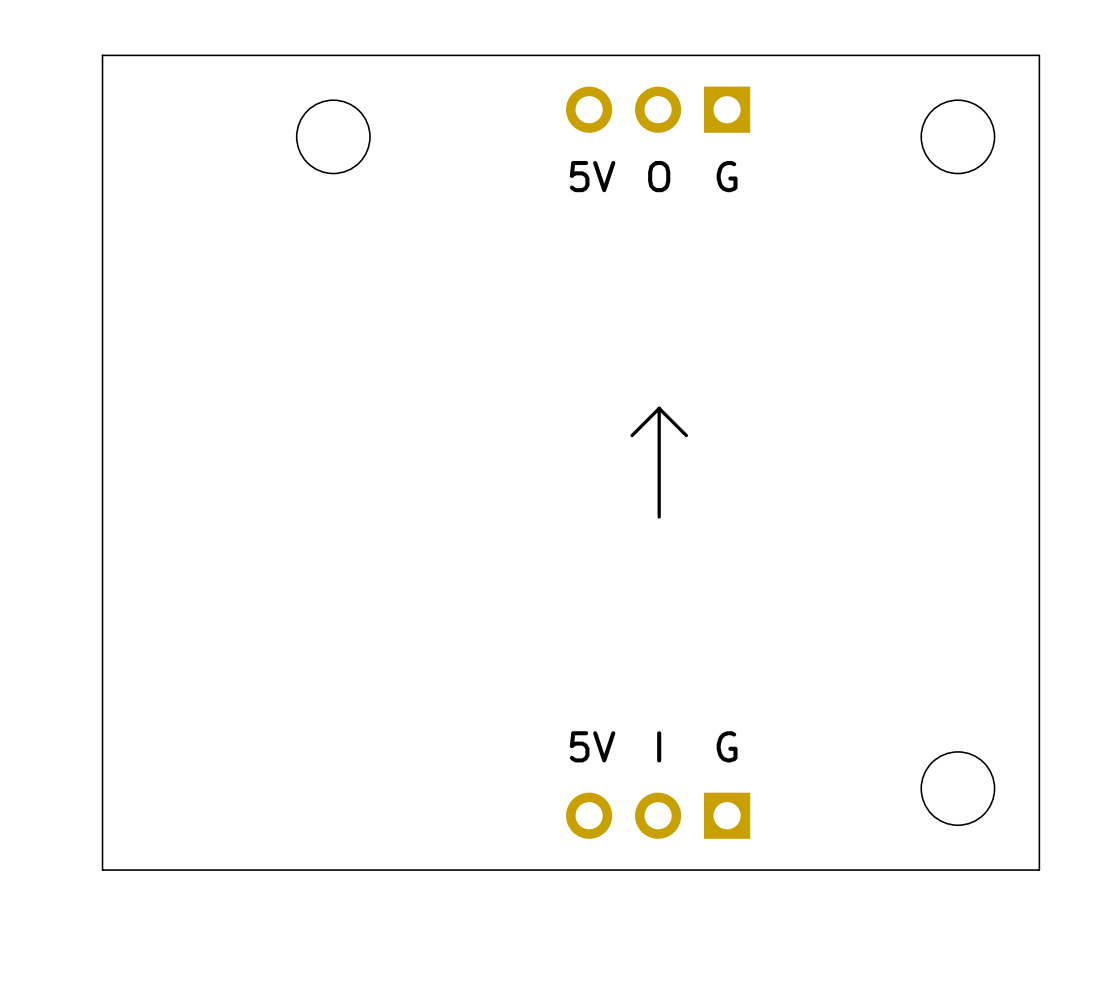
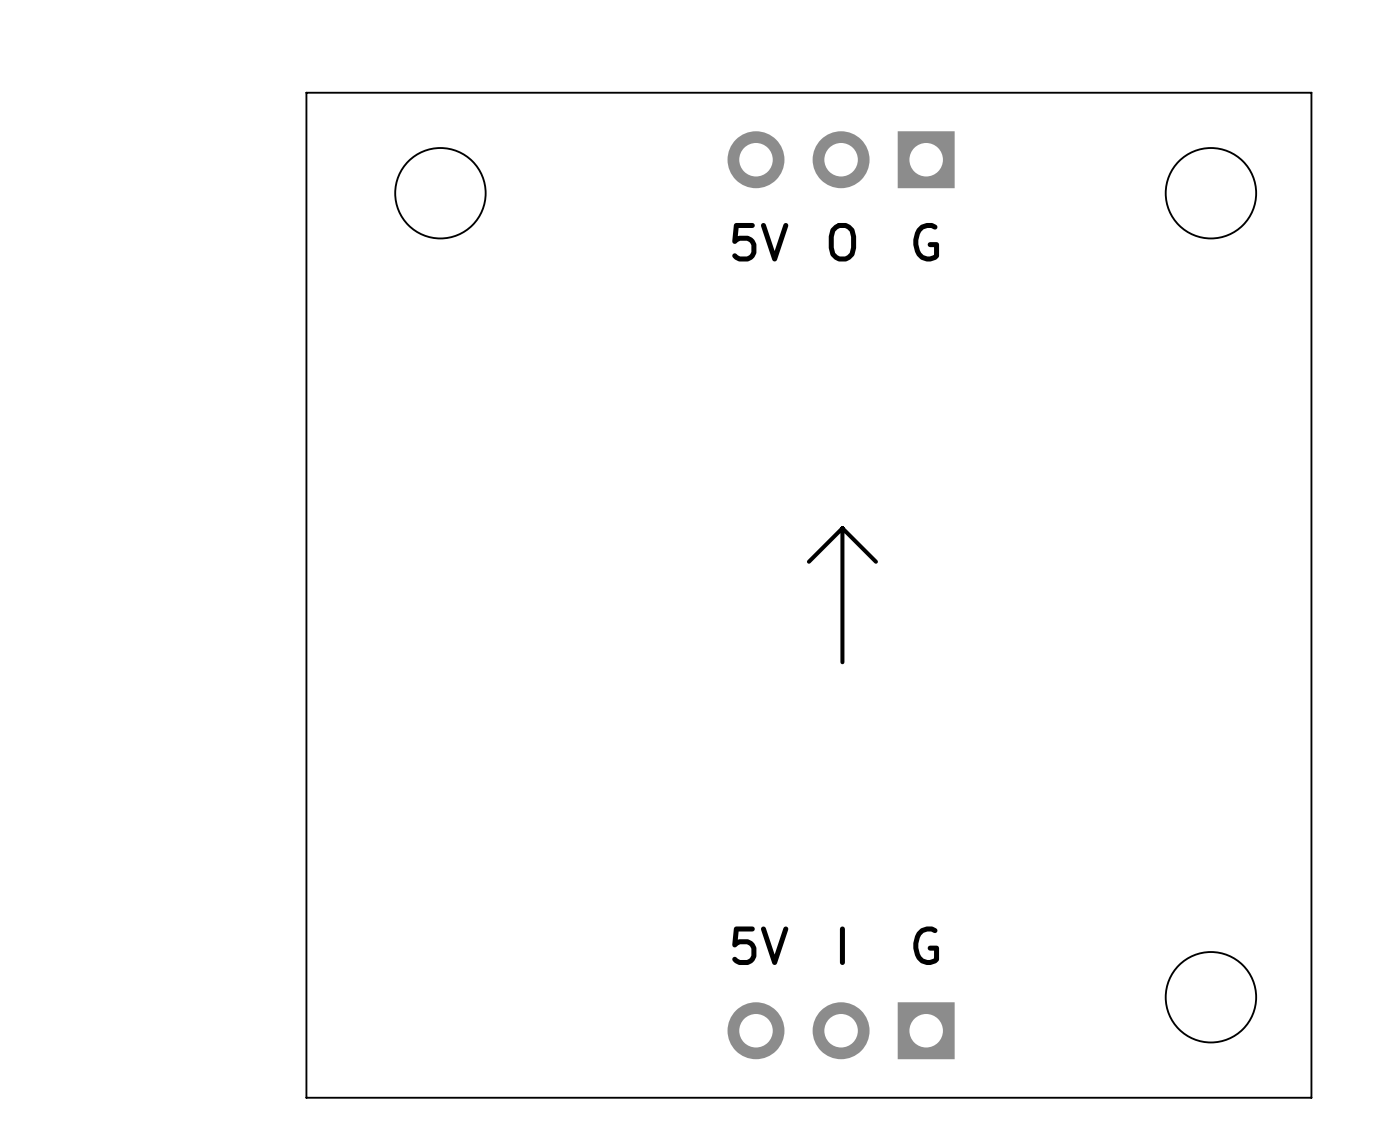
board edge: (224, 55) (102, 55) (102, 870) (224, 870) -> (306, 92) (306, 1097)

